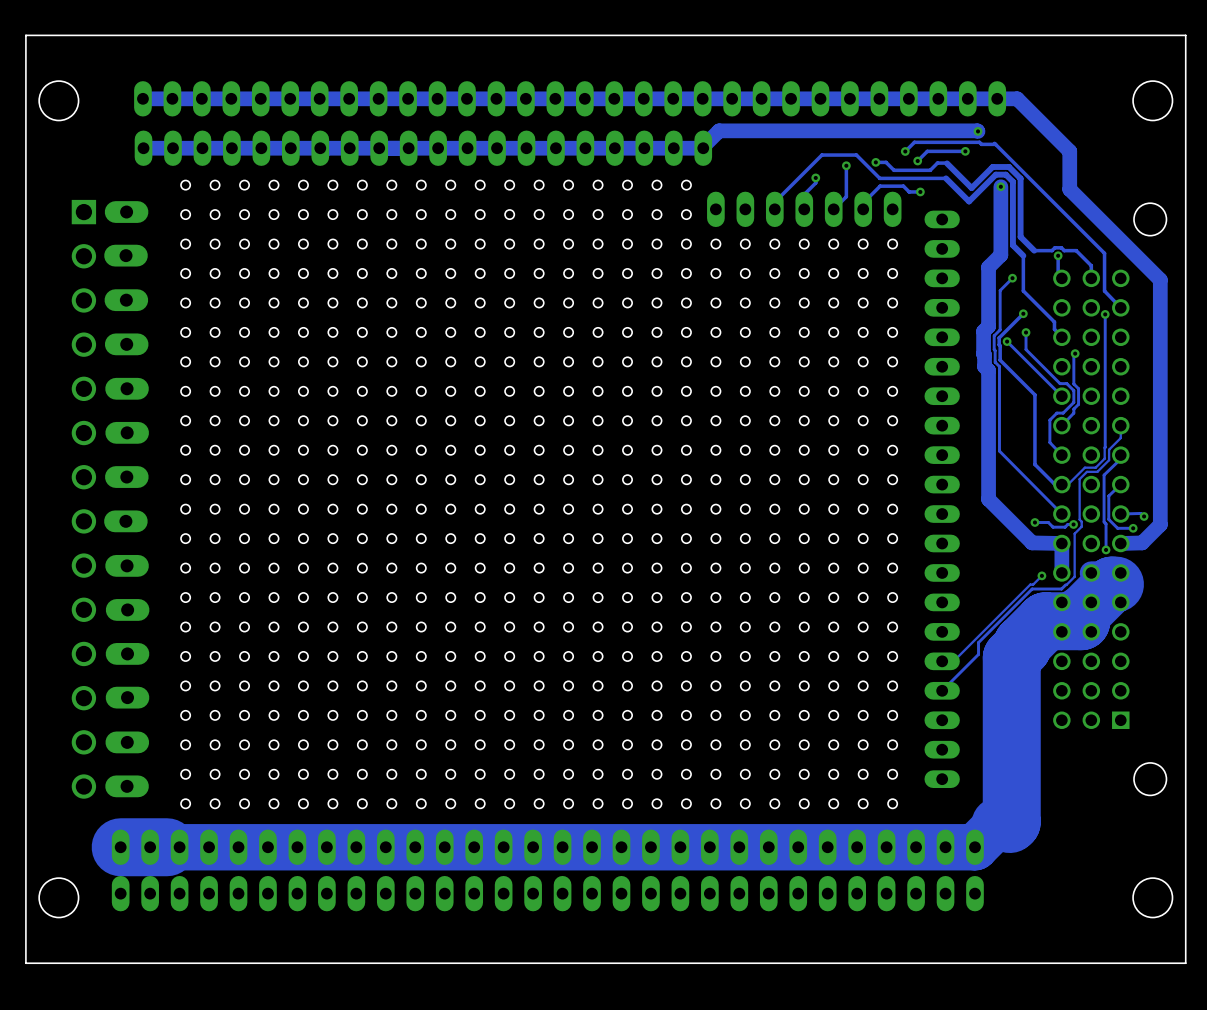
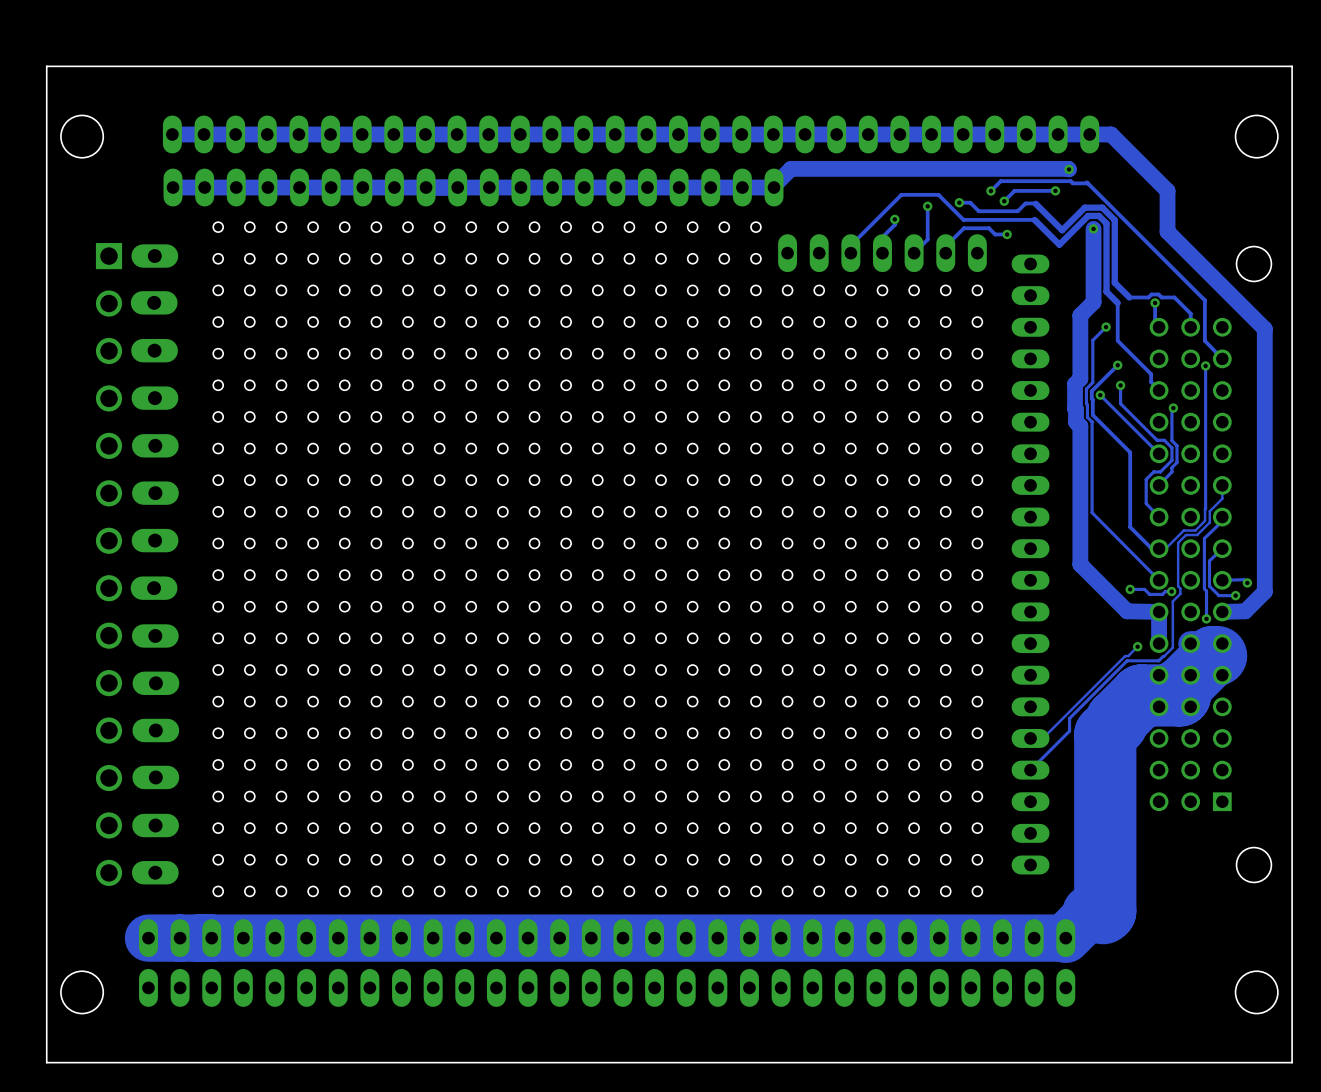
track width: thick (974, 847) (120, 847) -> thin (1065, 938) (148, 938)

